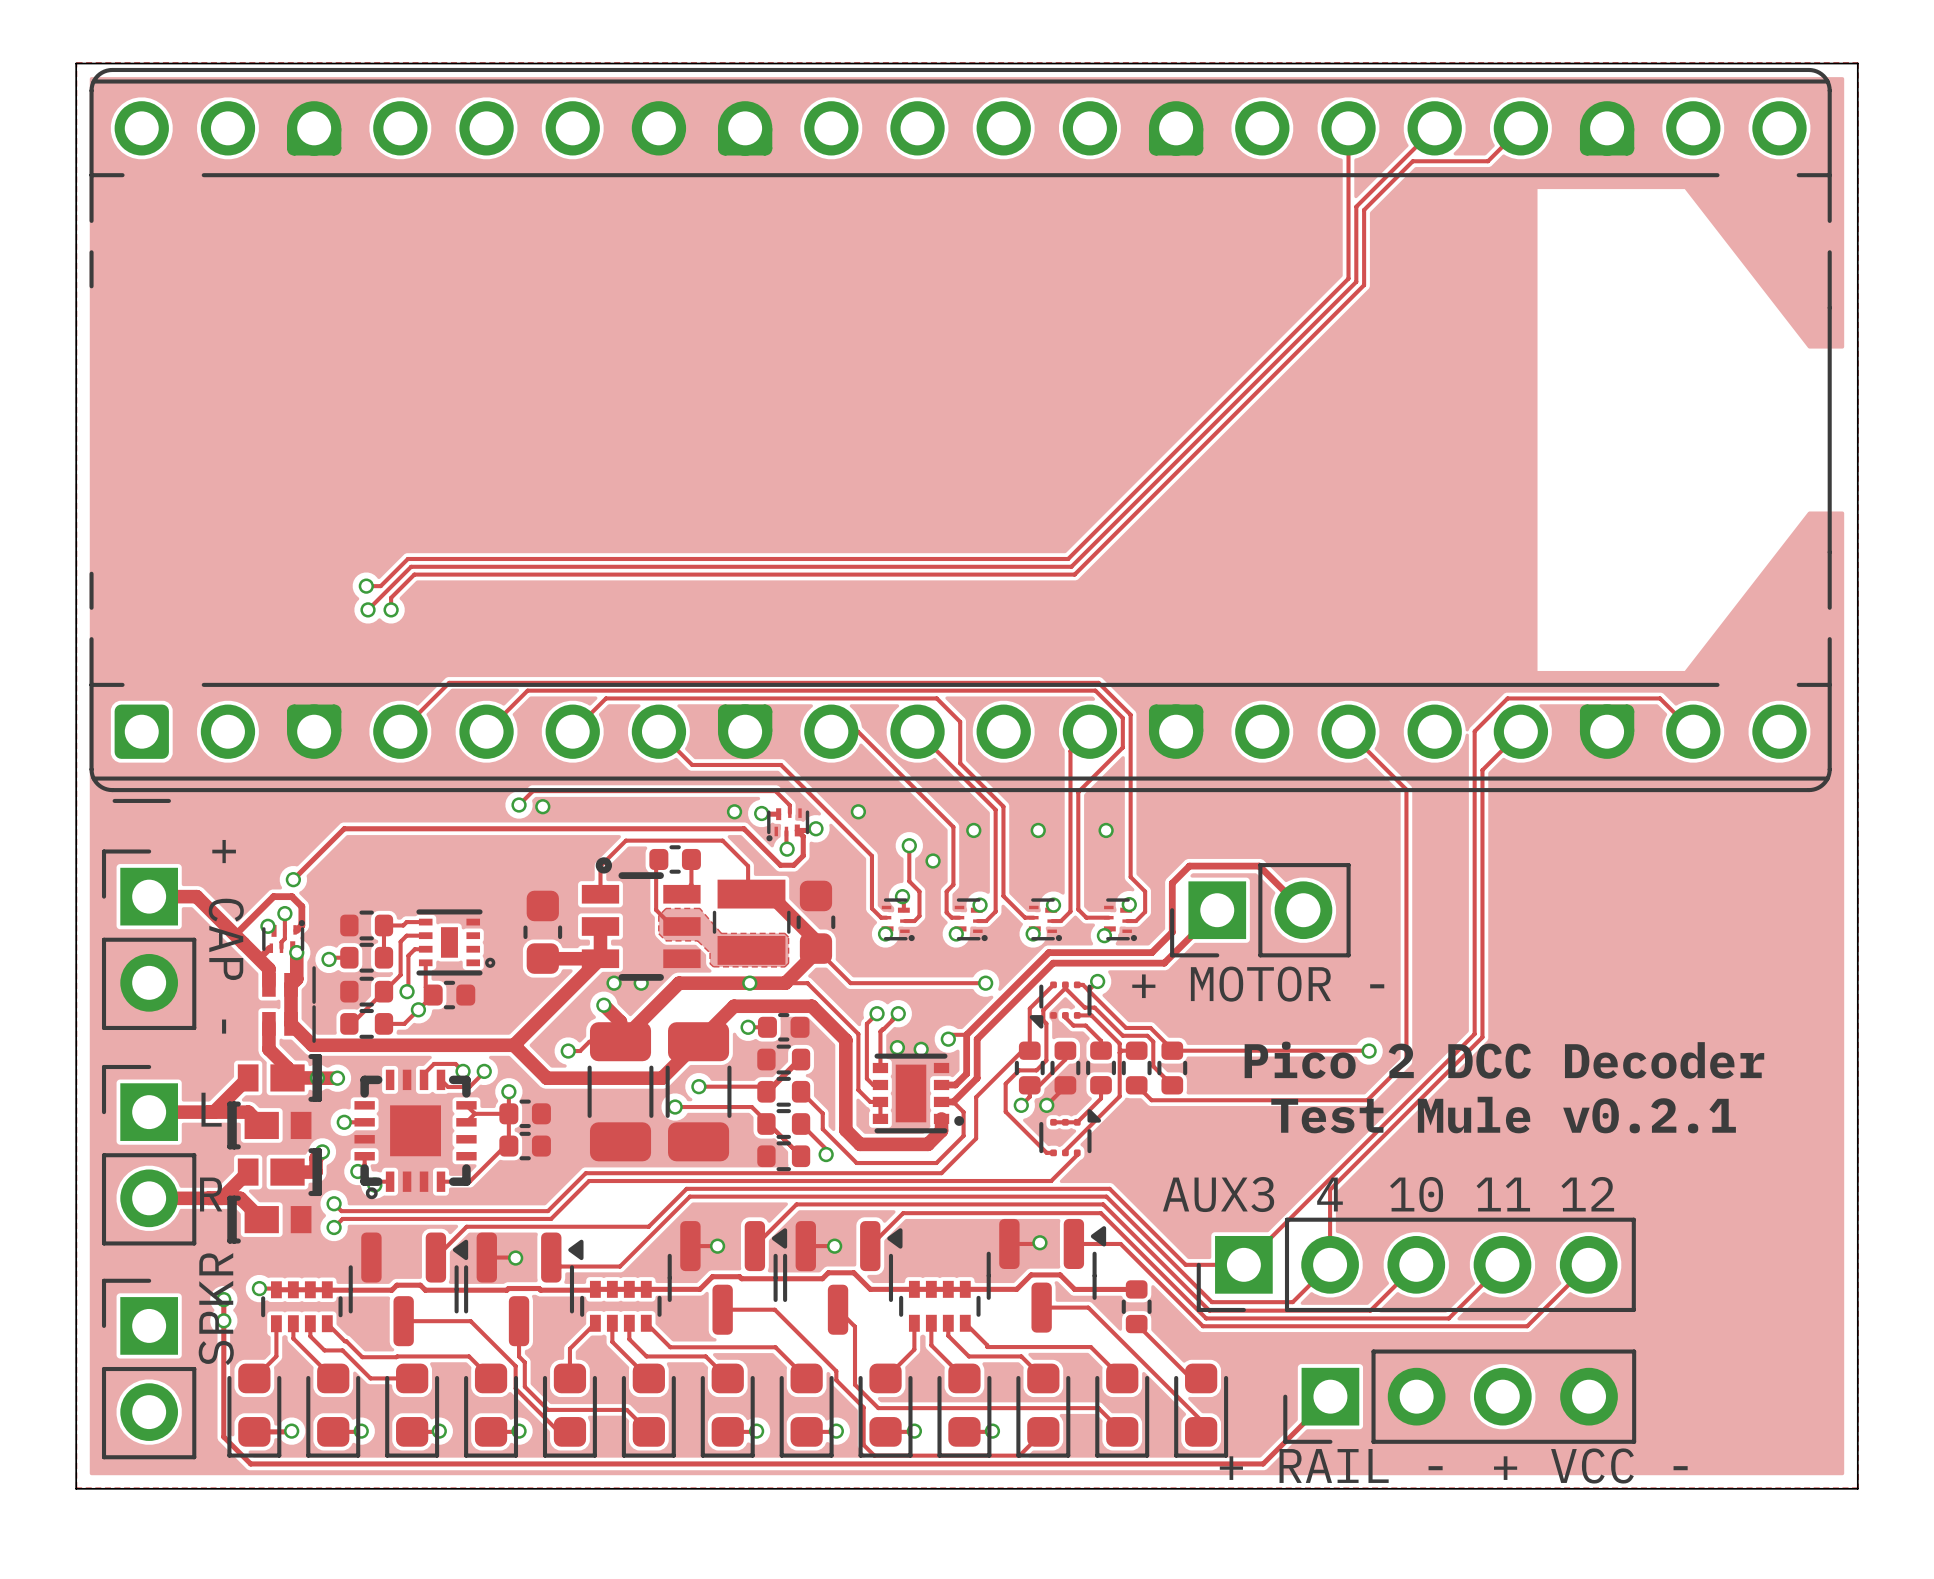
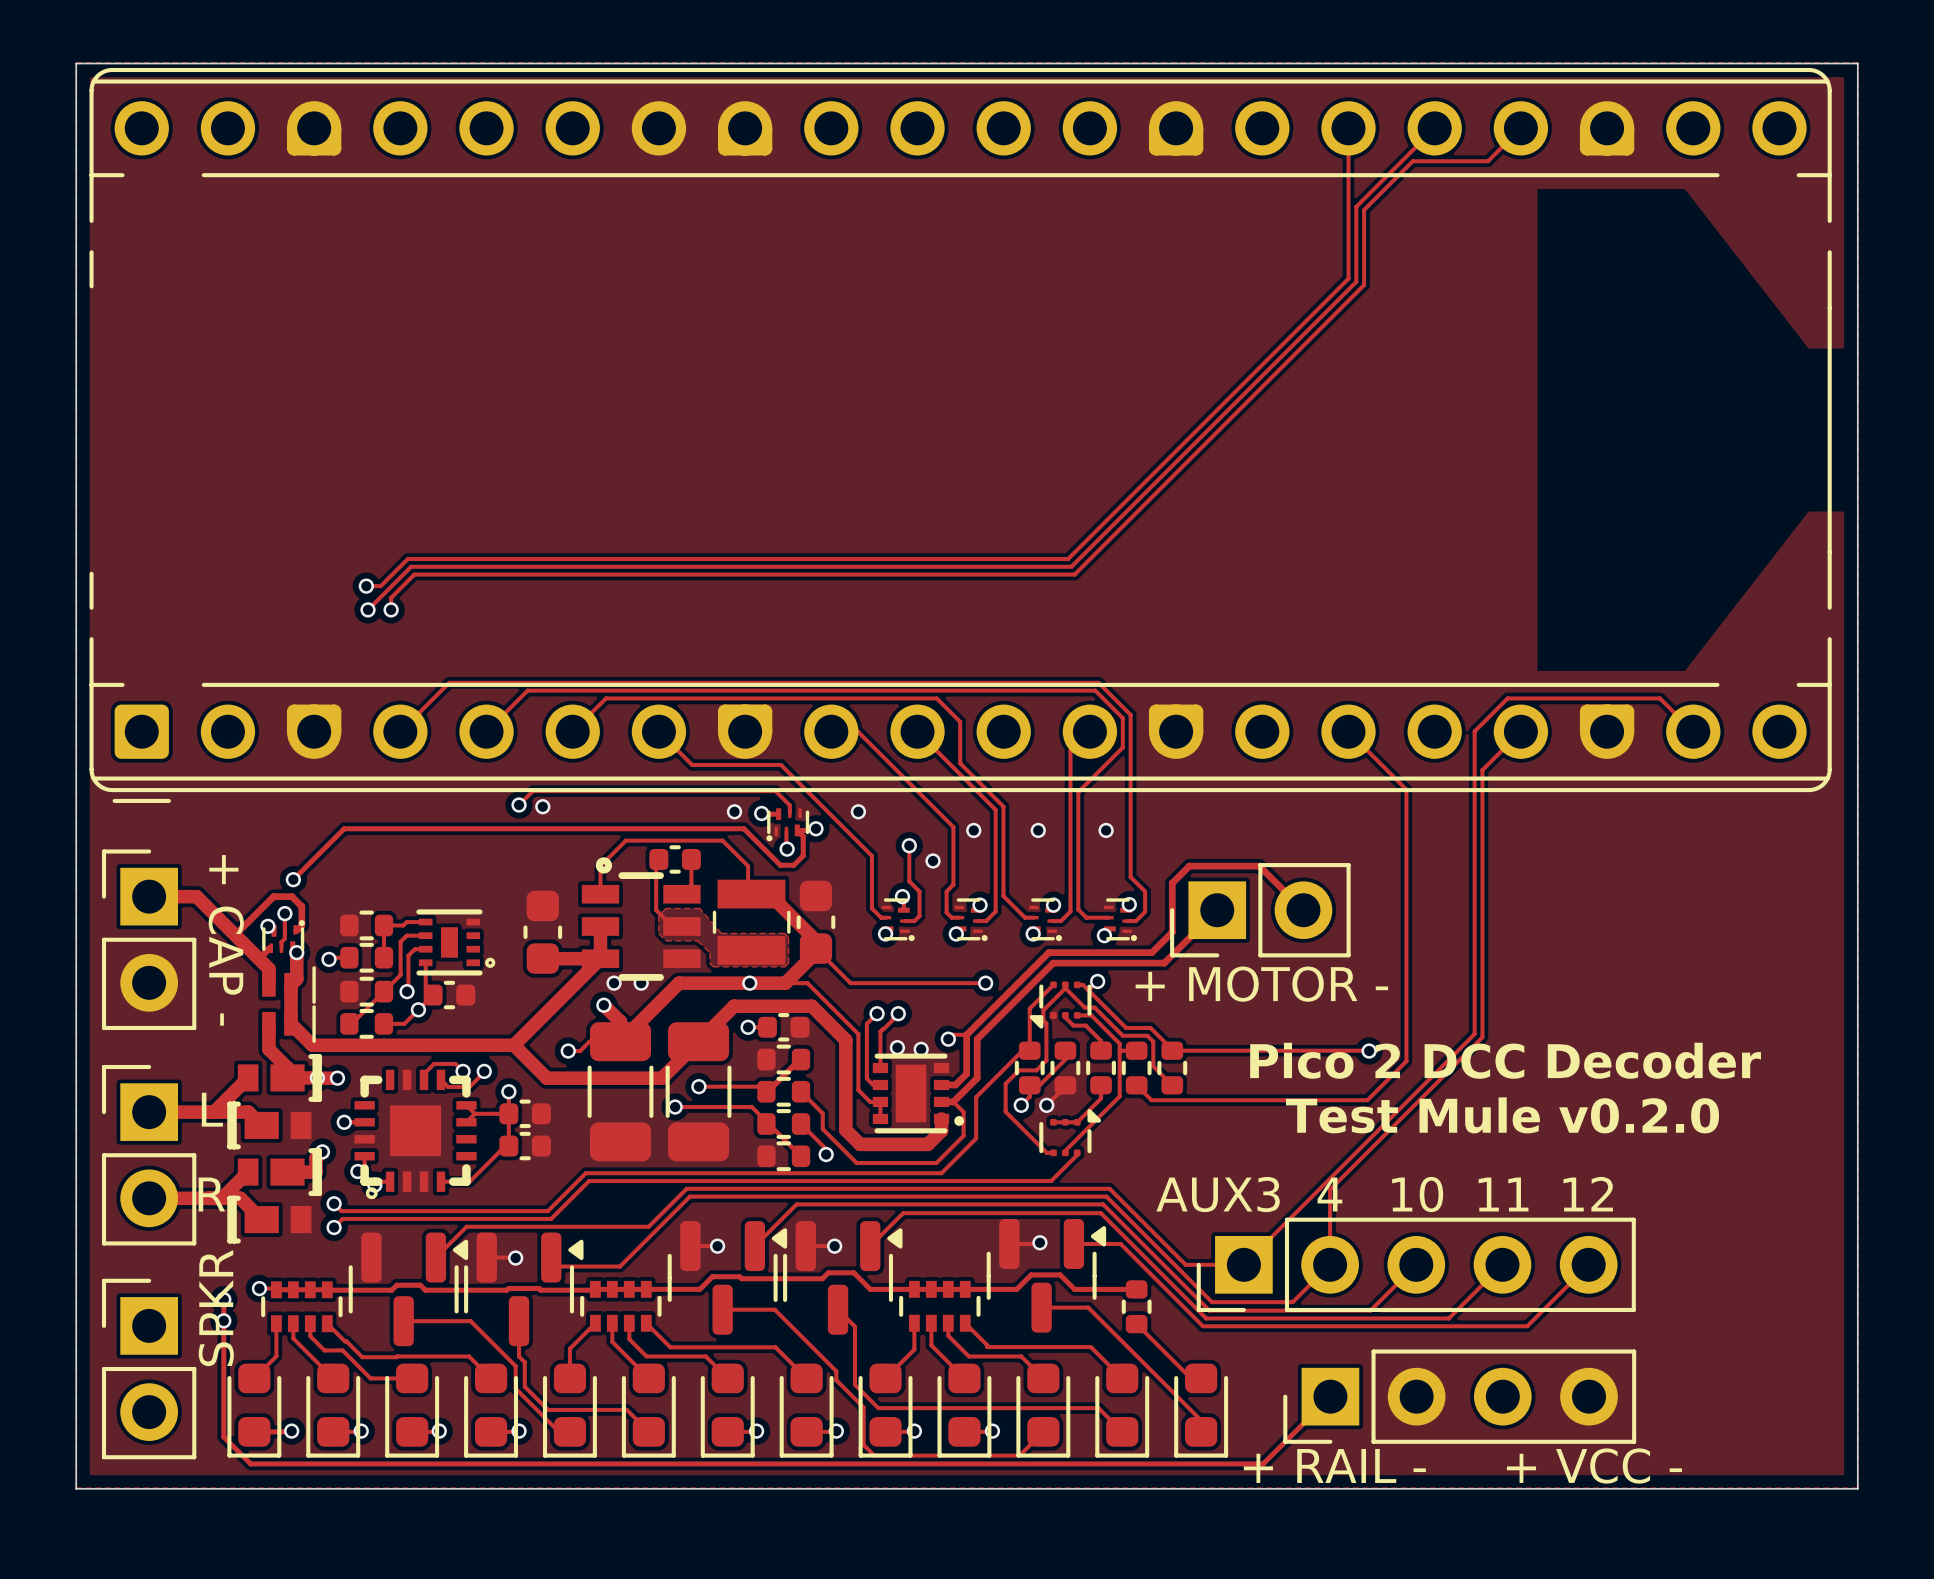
text: Test Mule v0.2.1 (1503, 1115) -> Test Mule v0.2.0 (1502, 1115)

